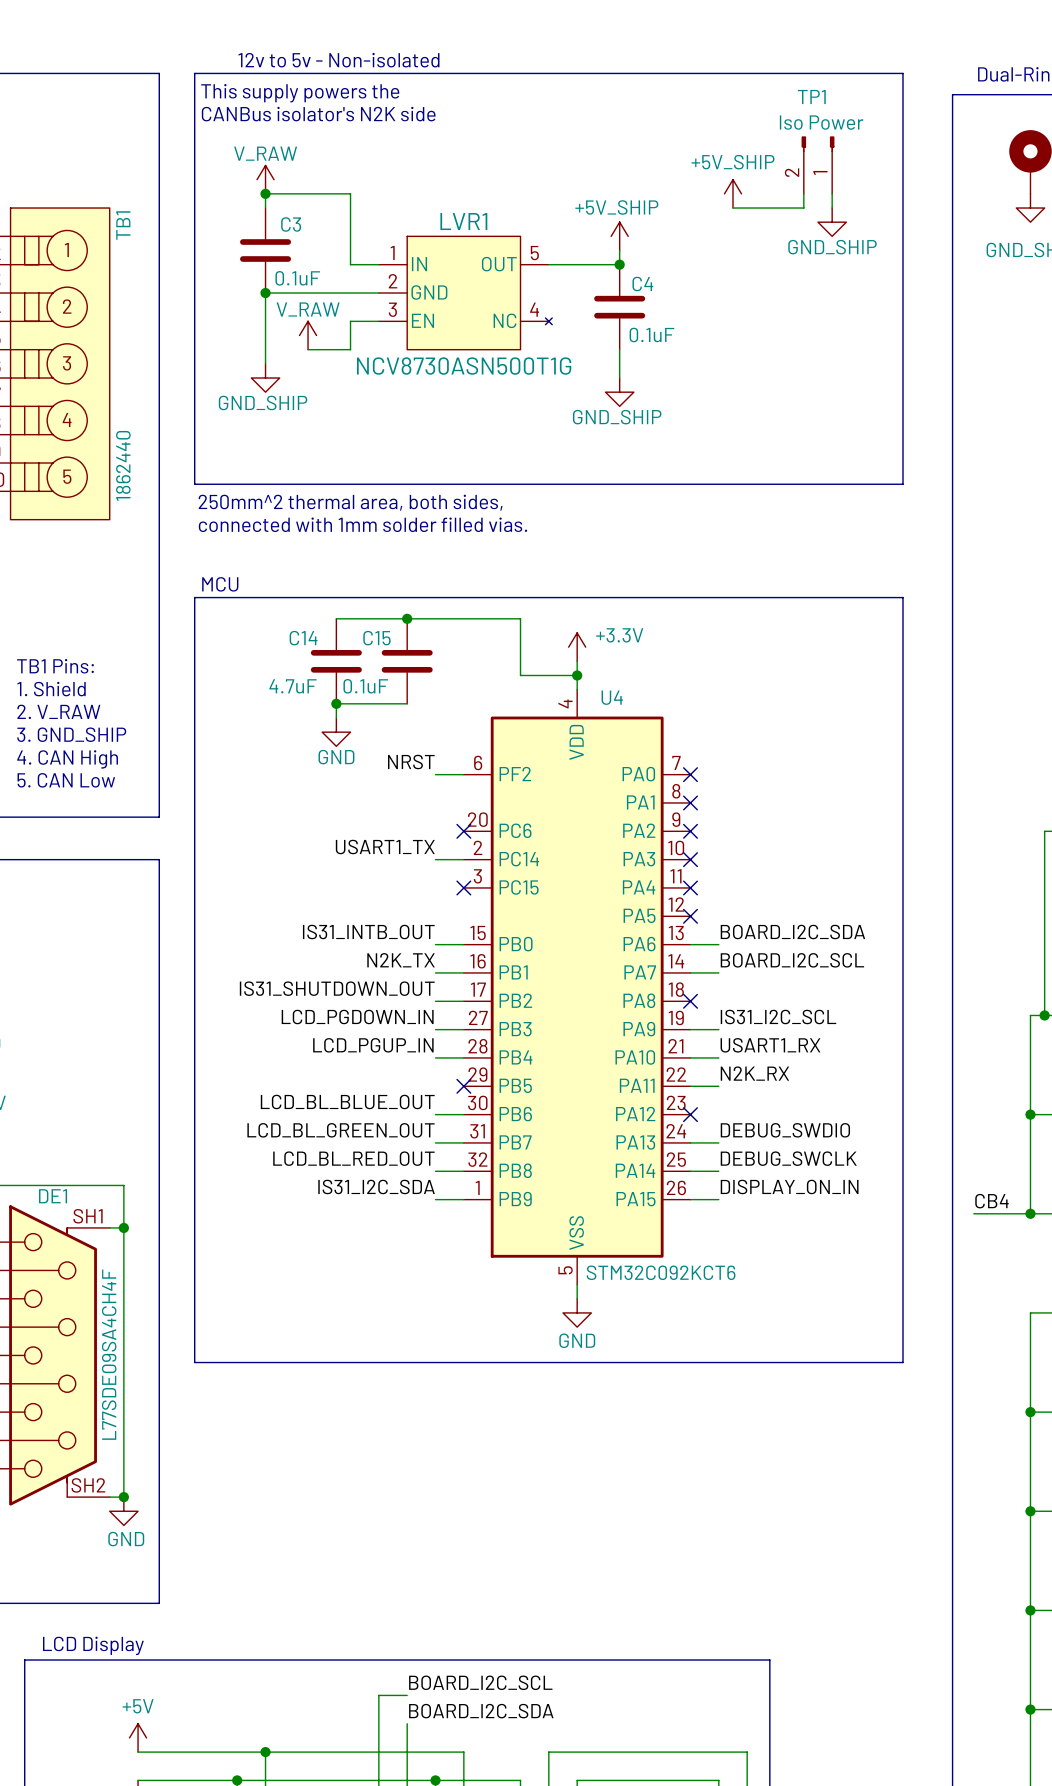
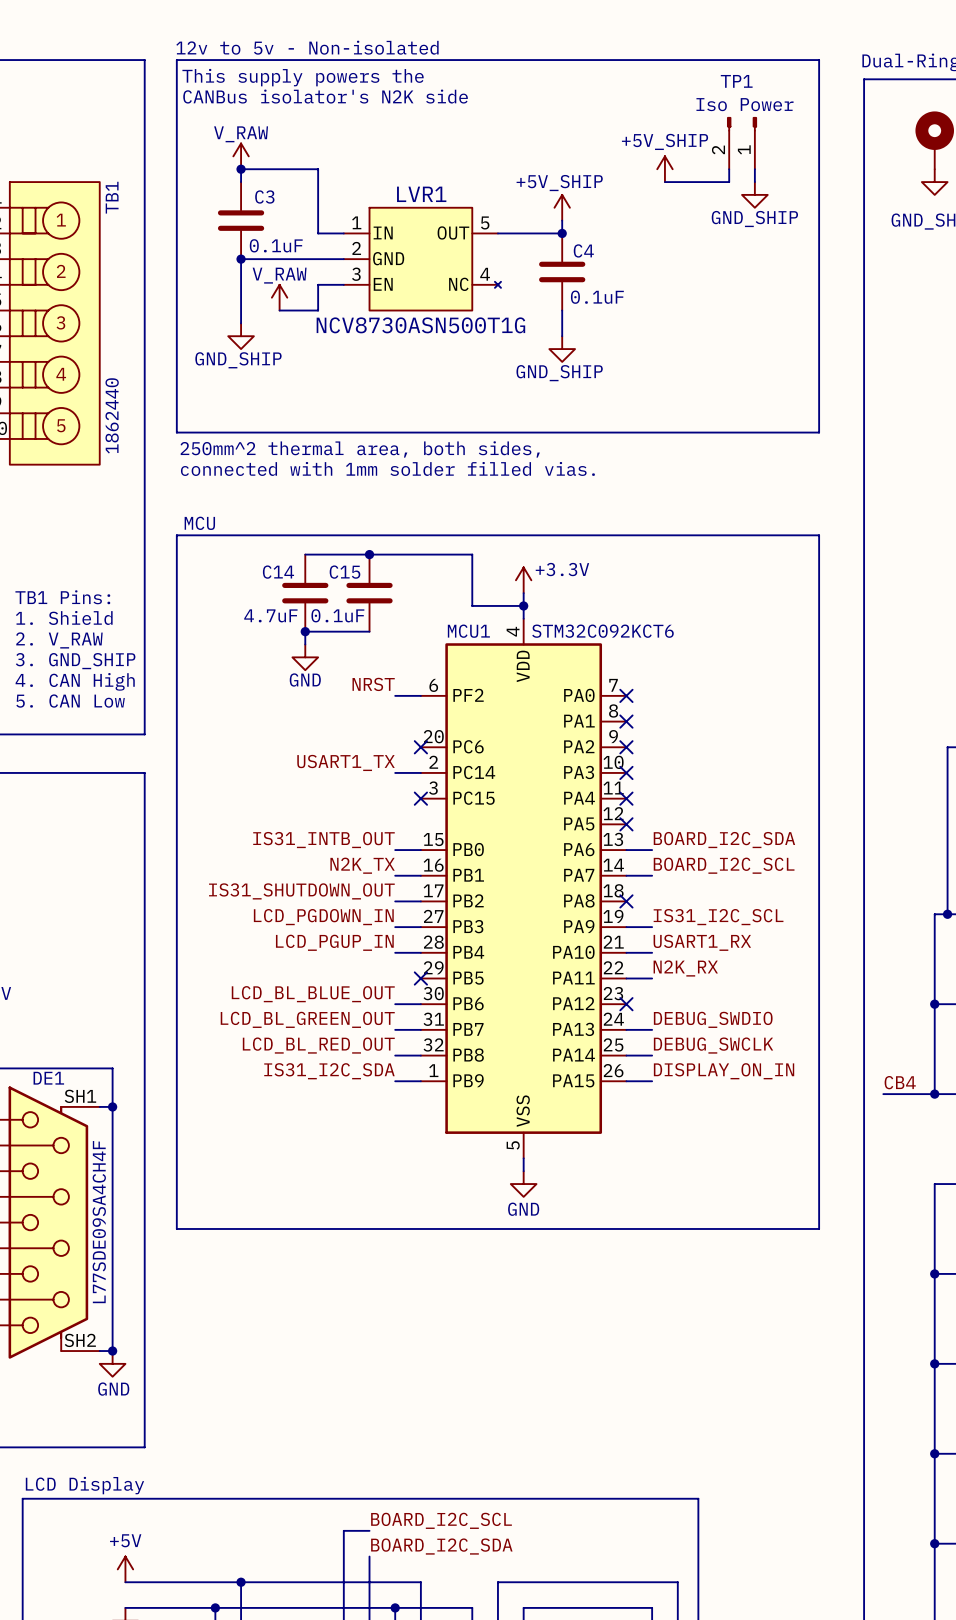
U4 name: U4 (612, 697) -> MCU1 (468, 631)
U4 value position: STM32C092KCT6 (661, 1272) -> STM32C092KCT6 (602, 631)

